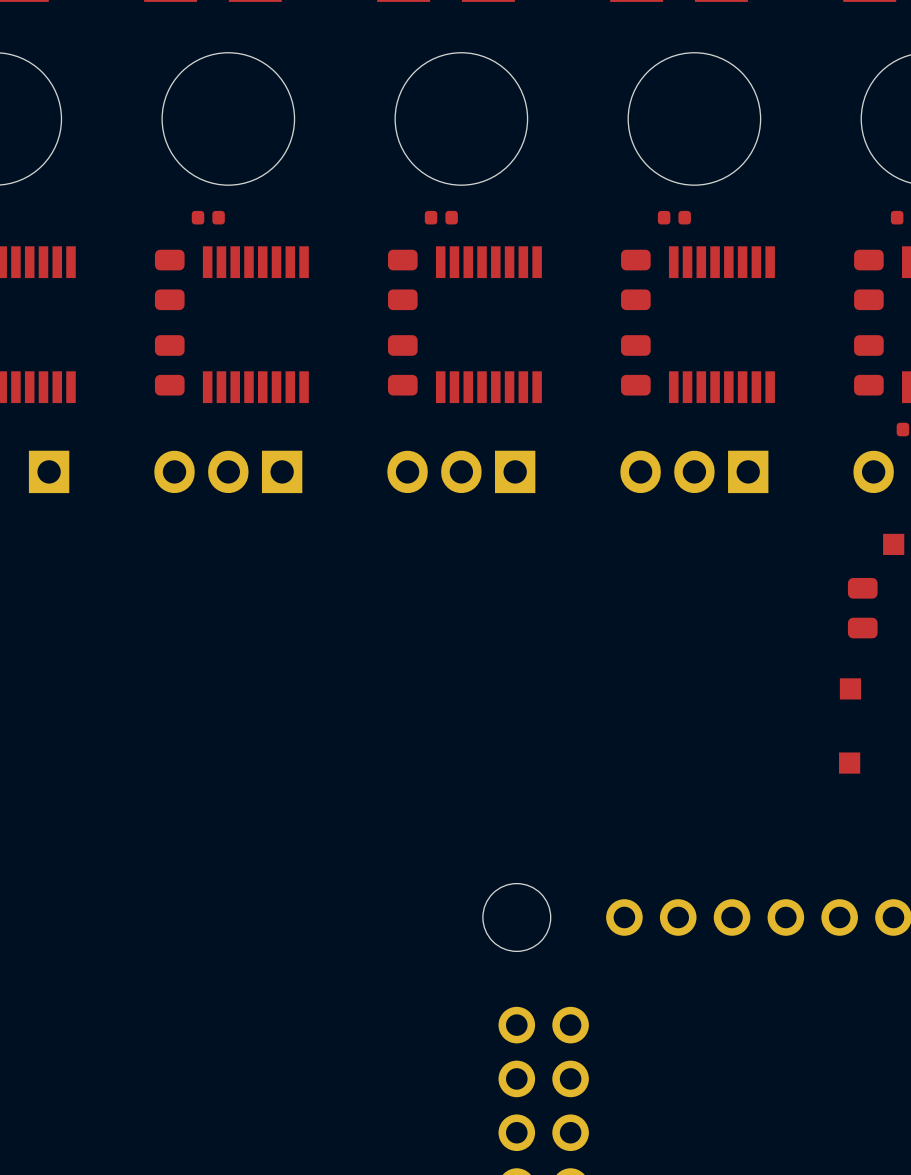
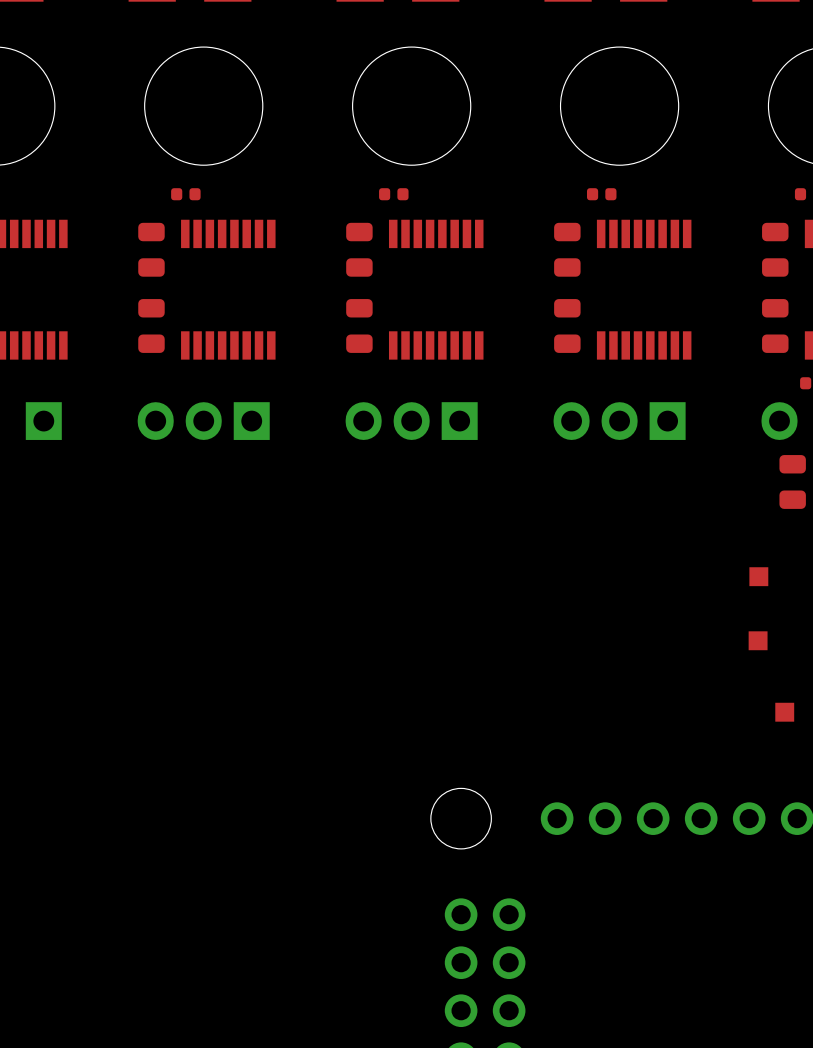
part footprint: [883, 533, 905, 556] -> [779, 455, 806, 509]
part: (862, 608) -> none
part: none -> (758, 576)
part: (850, 688) -> none
part: none -> (758, 640)
part: (849, 763) -> none
part: none -> (784, 712)

